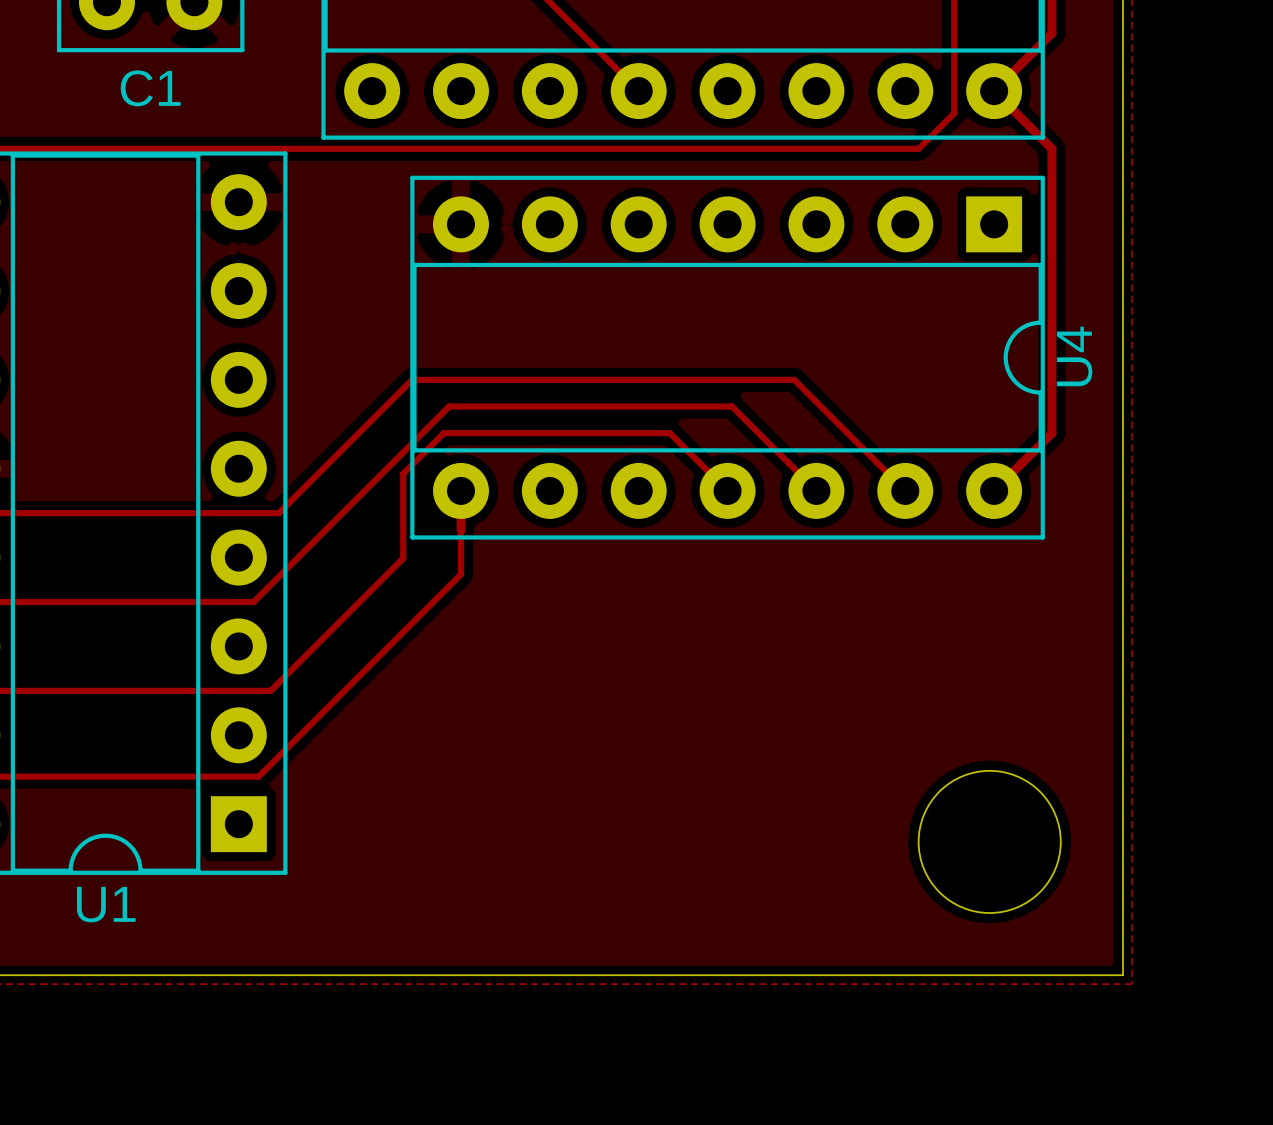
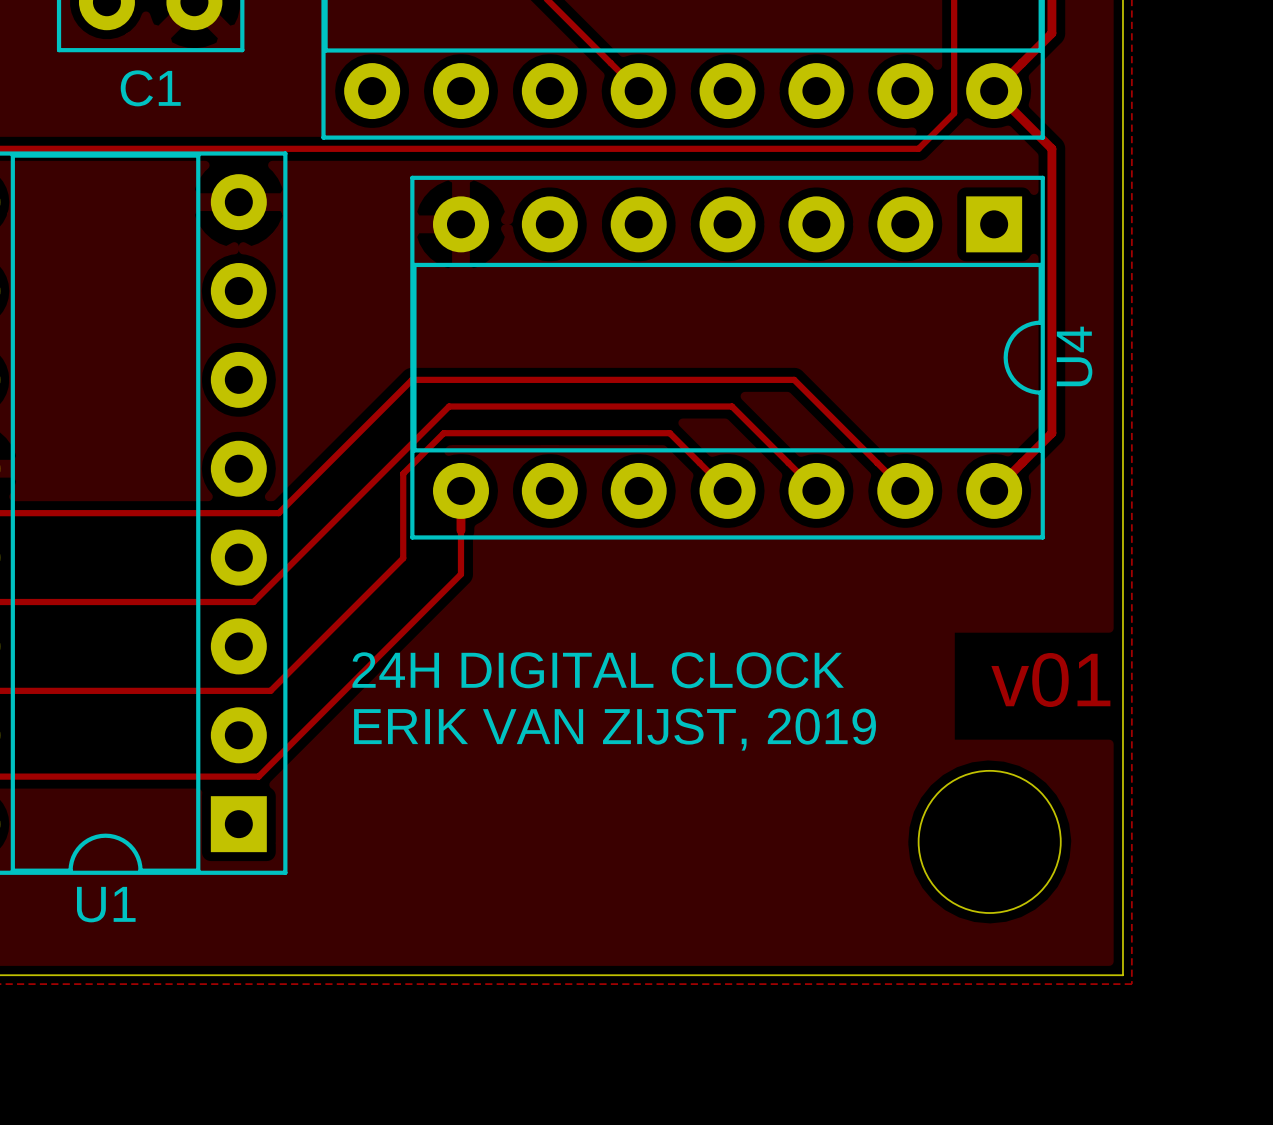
text: none -> 24H DIGITAL CLOCK (598, 670)
text: none -> v01 (1050, 680)
text: none -> ERIK VAN ZIJST, 2019 (615, 729)

